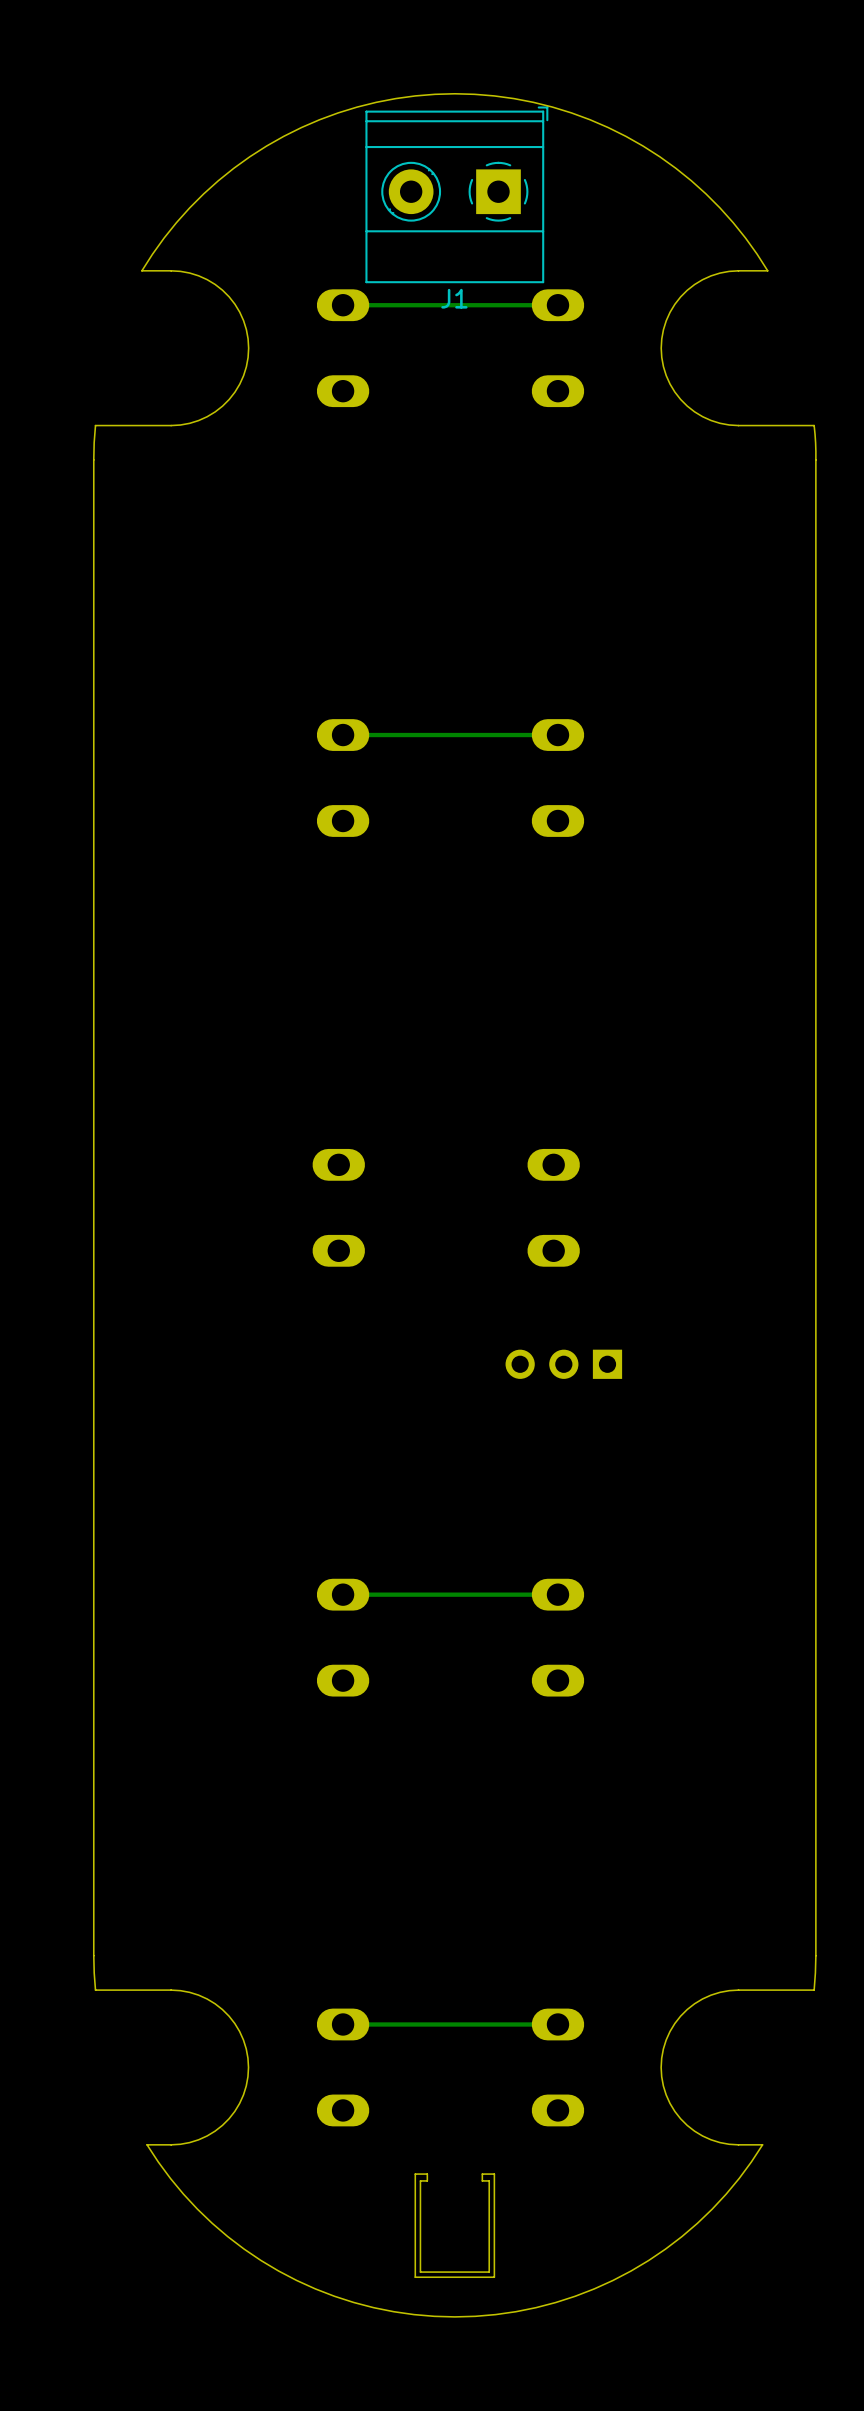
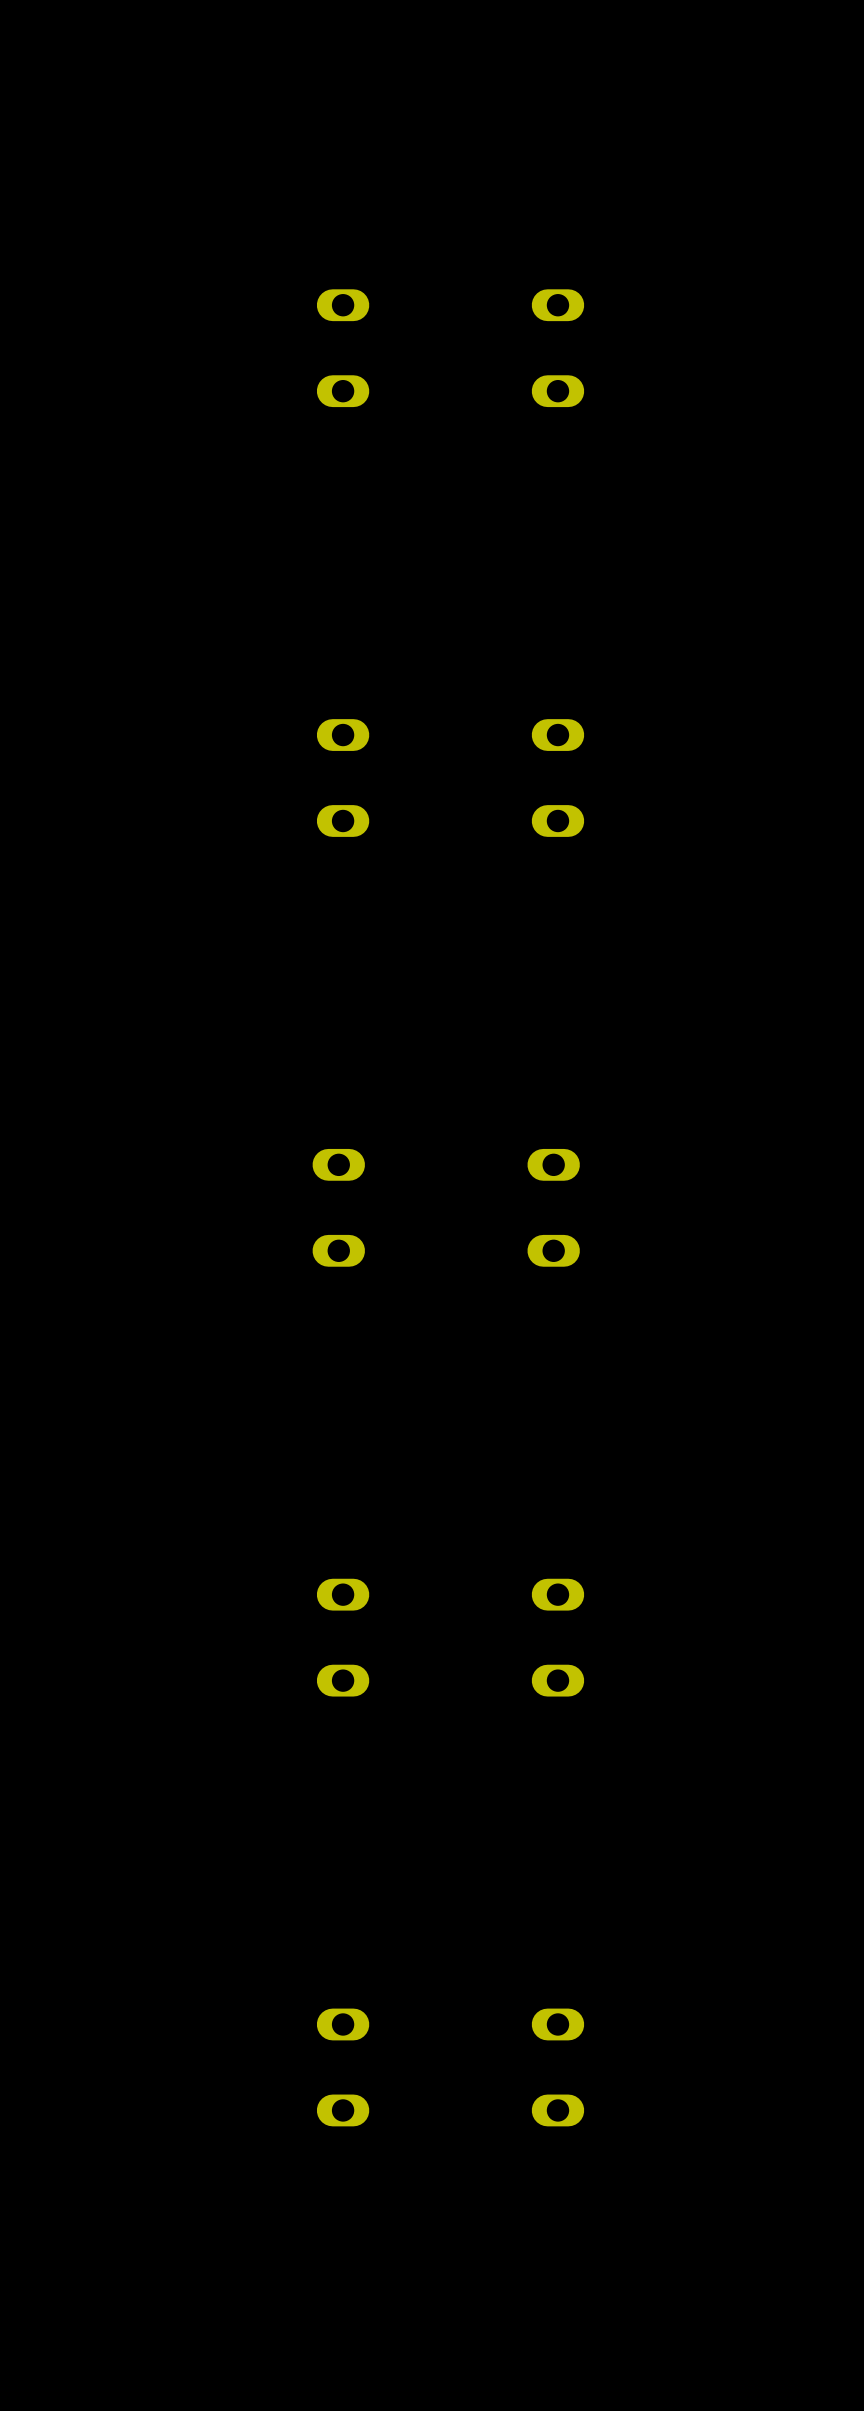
J1: (456, 194) -> none
board edge: (767, 270) (720, 273) (694, 284) (680, 296) (670, 312) (663, 329) (661, 348) (663, 366) (674, 392) (687, 406) (702, 416) (729, 424) (814, 425) (815, 434) (815, 1955) (814, 1990) (738, 1990) (719, 1992) (702, 1998) (687, 2009) (670, 2031) (661, 2058) (661, 2076) (666, 2094) (680, 2118) (694, 2131) (711, 2139) (729, 2144) (762, 2144) (726, 2194) (681, 2236) (648, 2260) (612, 2280) (555, 2302) (515, 2311) (475, 2316) (434, 2316) (393, 2311) (353, 2302) (315, 2288) (278, 2270) (244, 2249) (212, 2223) (183, 2194) (147, 2144) (180, 2144) (198, 2139) (222, 2125) (234, 2111) (243, 2094) (248, 2067) (243, 2040) (229, 2016) (207, 1998) (189, 1992) (171, 1990) (95, 1990) (93, 1955) (93, 459) (95, 425) (171, 425) (189, 423) (215, 411) (229, 399) (243, 375) (248, 348) (243, 320) (234, 304) (215, 284) (198, 275) (180, 271) (141, 270) (164, 238) (189, 207) (218, 180) (249, 156) (301, 127) (338, 112) (376, 102) (435, 94) (494, 95) (552, 107) (590, 119) (643, 146) (691, 180) (733, 222) (767, 270) -> none
track: (557, 305) (343, 305) -> none
track: (557, 735) (343, 735) -> none
part: (563, 1364) -> none
track: (557, 1594) (343, 1594) -> none
track: (557, 2024) (343, 2024) -> none
board edge: (494, 2174) (494, 2277) (415, 2277) (415, 2174) (427, 2174) (427, 2180) (420, 2180) (420, 2272) (489, 2272) (489, 2180) (482, 2180) (482, 2174) (494, 2174) -> none

